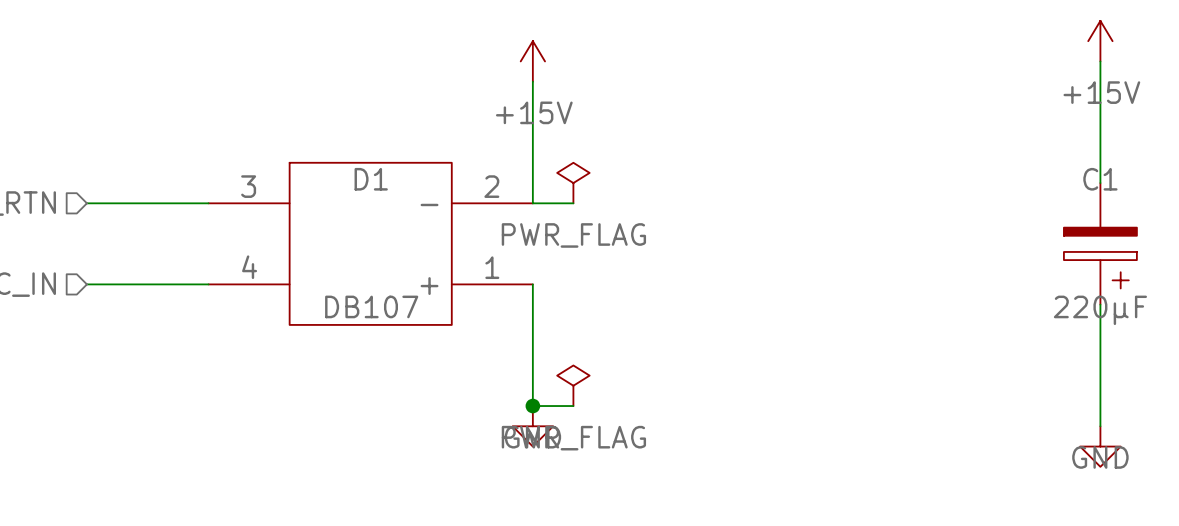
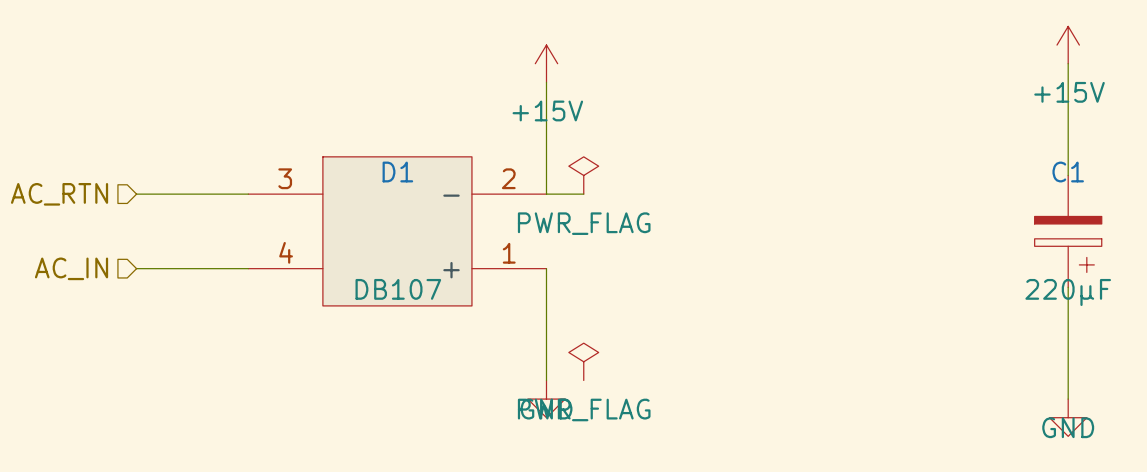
wire: (532, 406) (573, 406) -> none
junction: (532, 406) -> none

